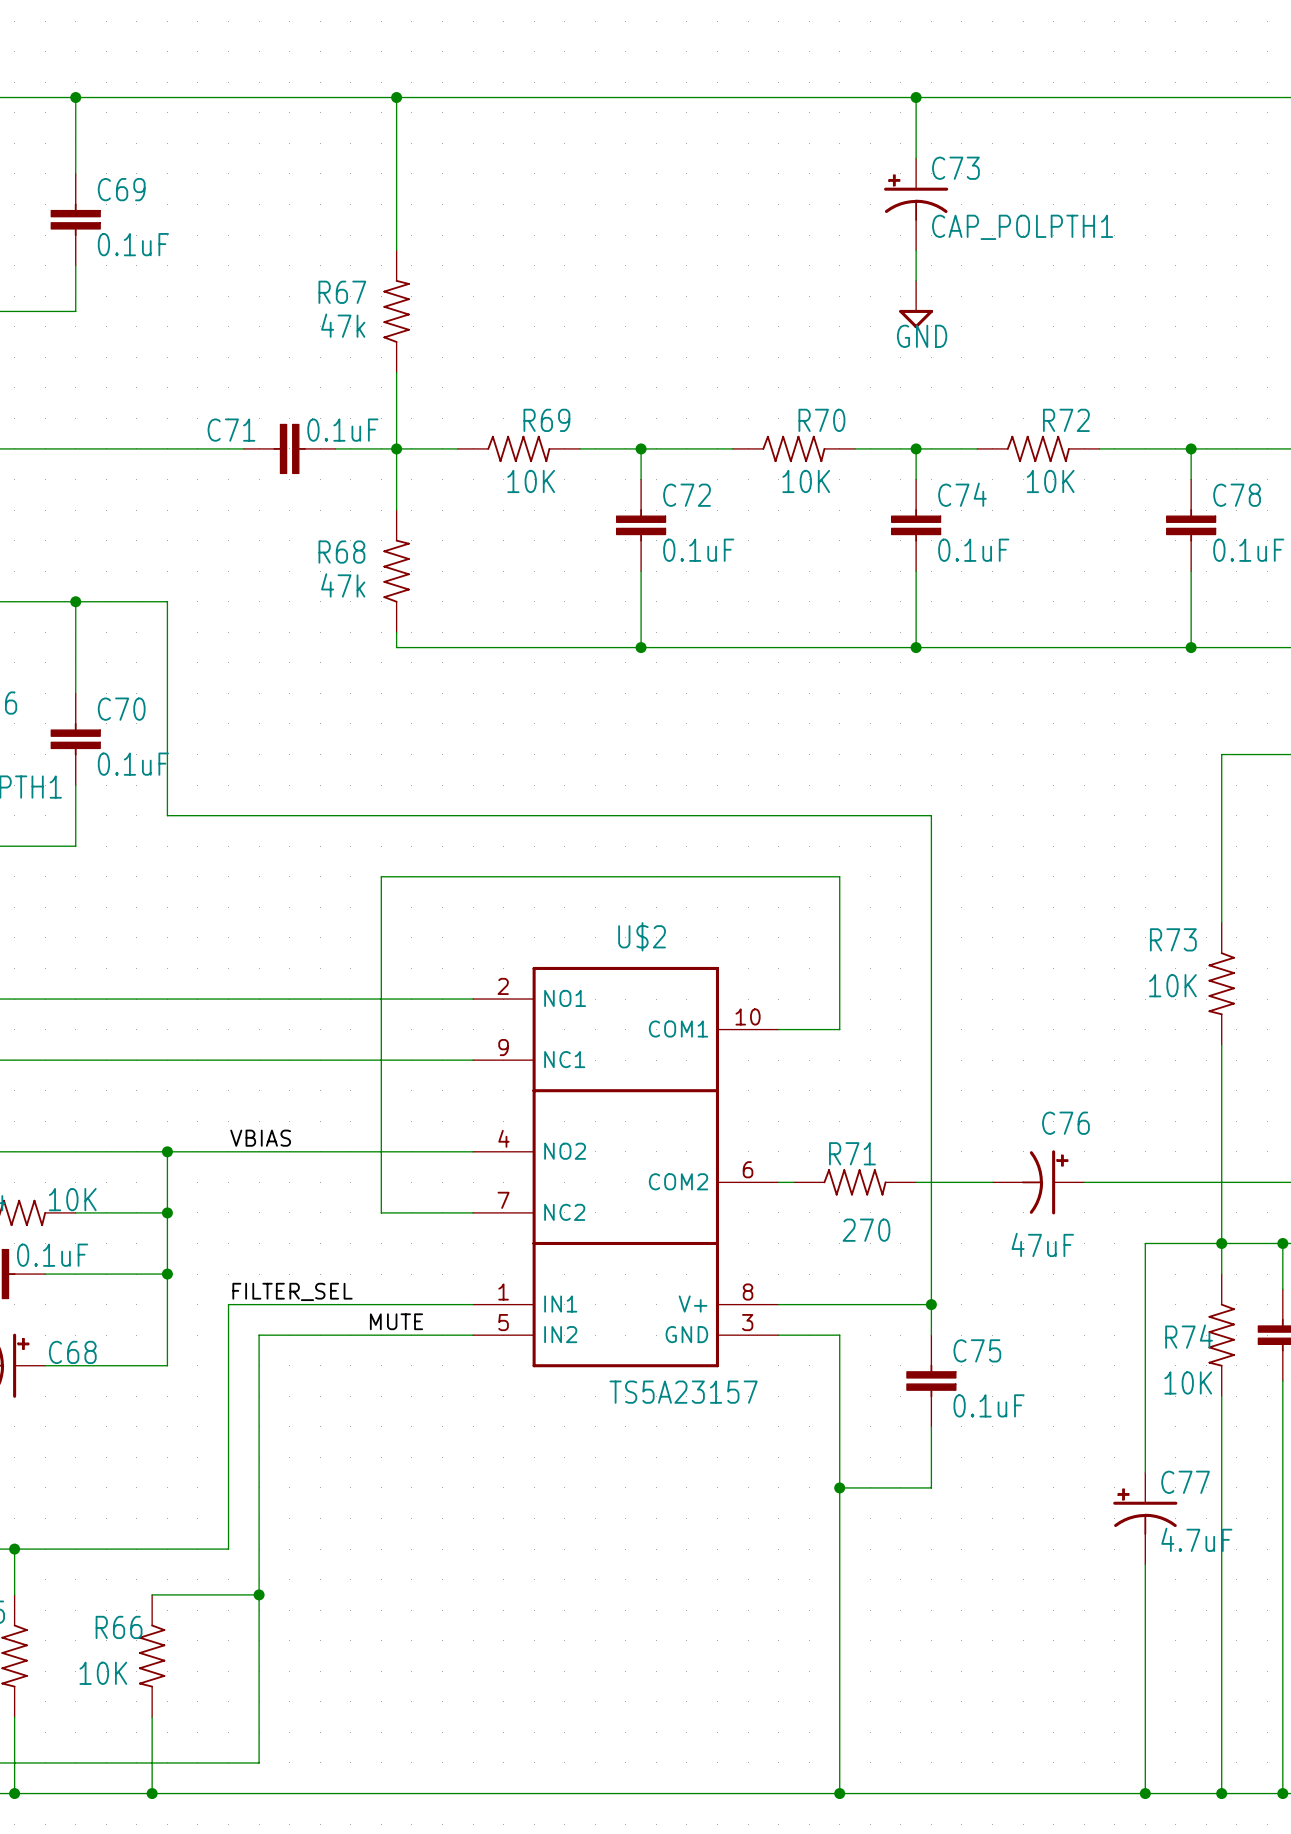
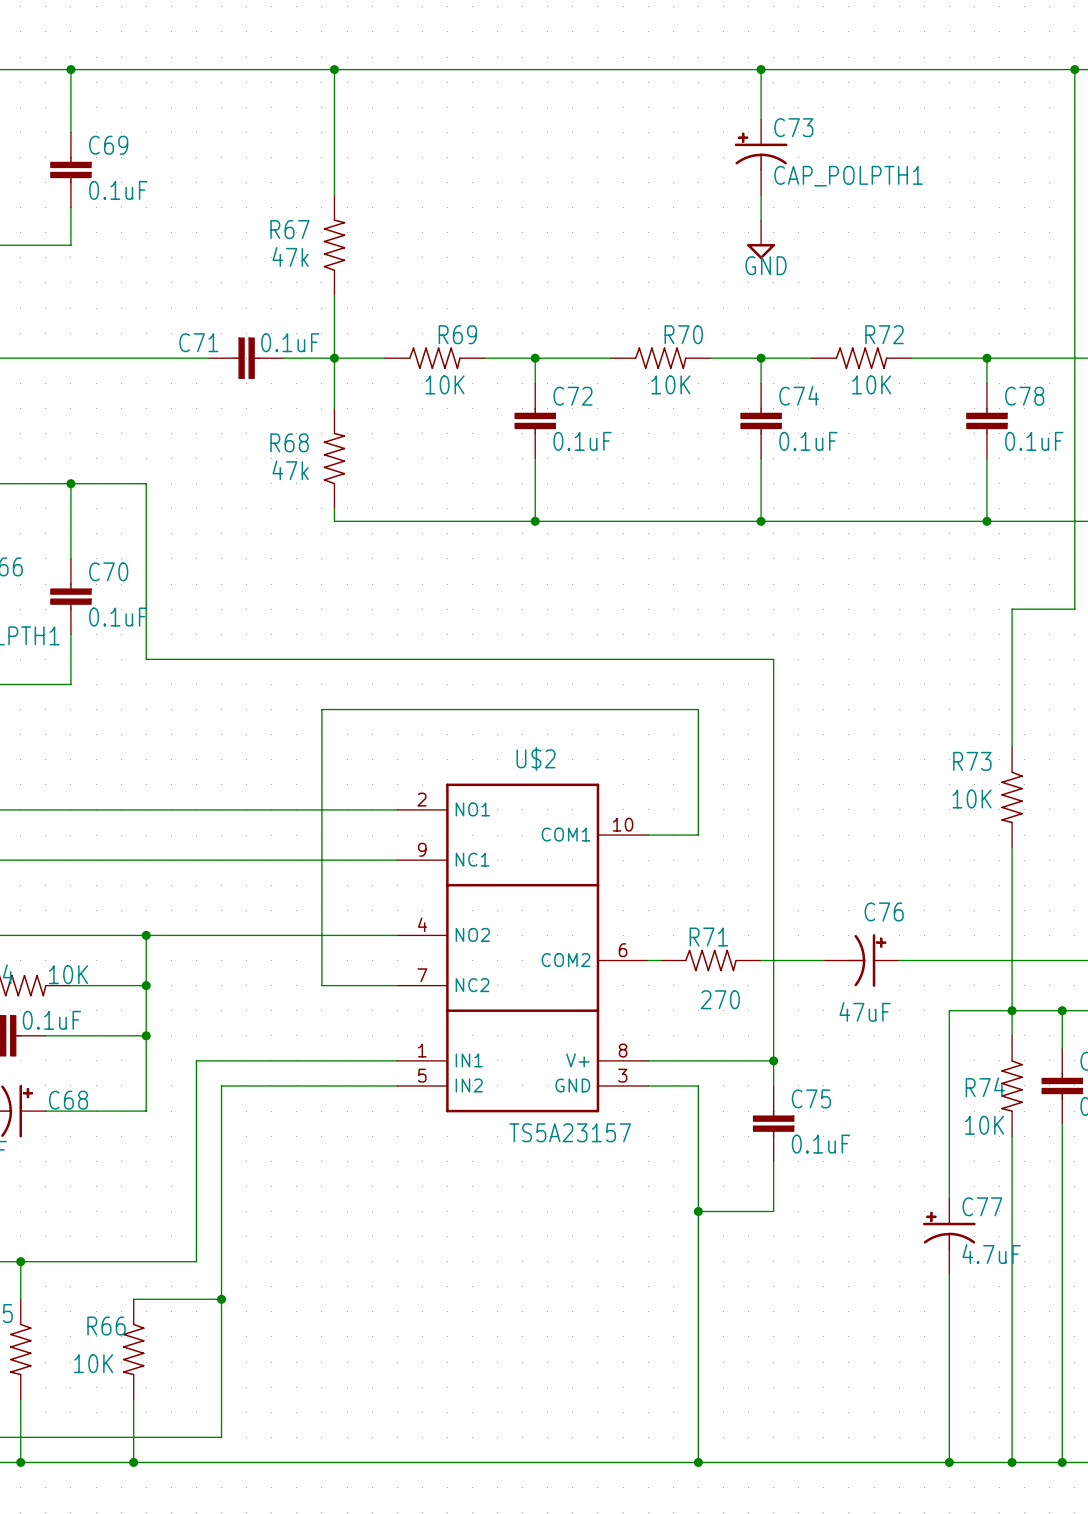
label: VBIAS (260, 1138) -> none
label: FILTER_SEL (292, 1291) -> none
label: MUTE (396, 1321) -> none

